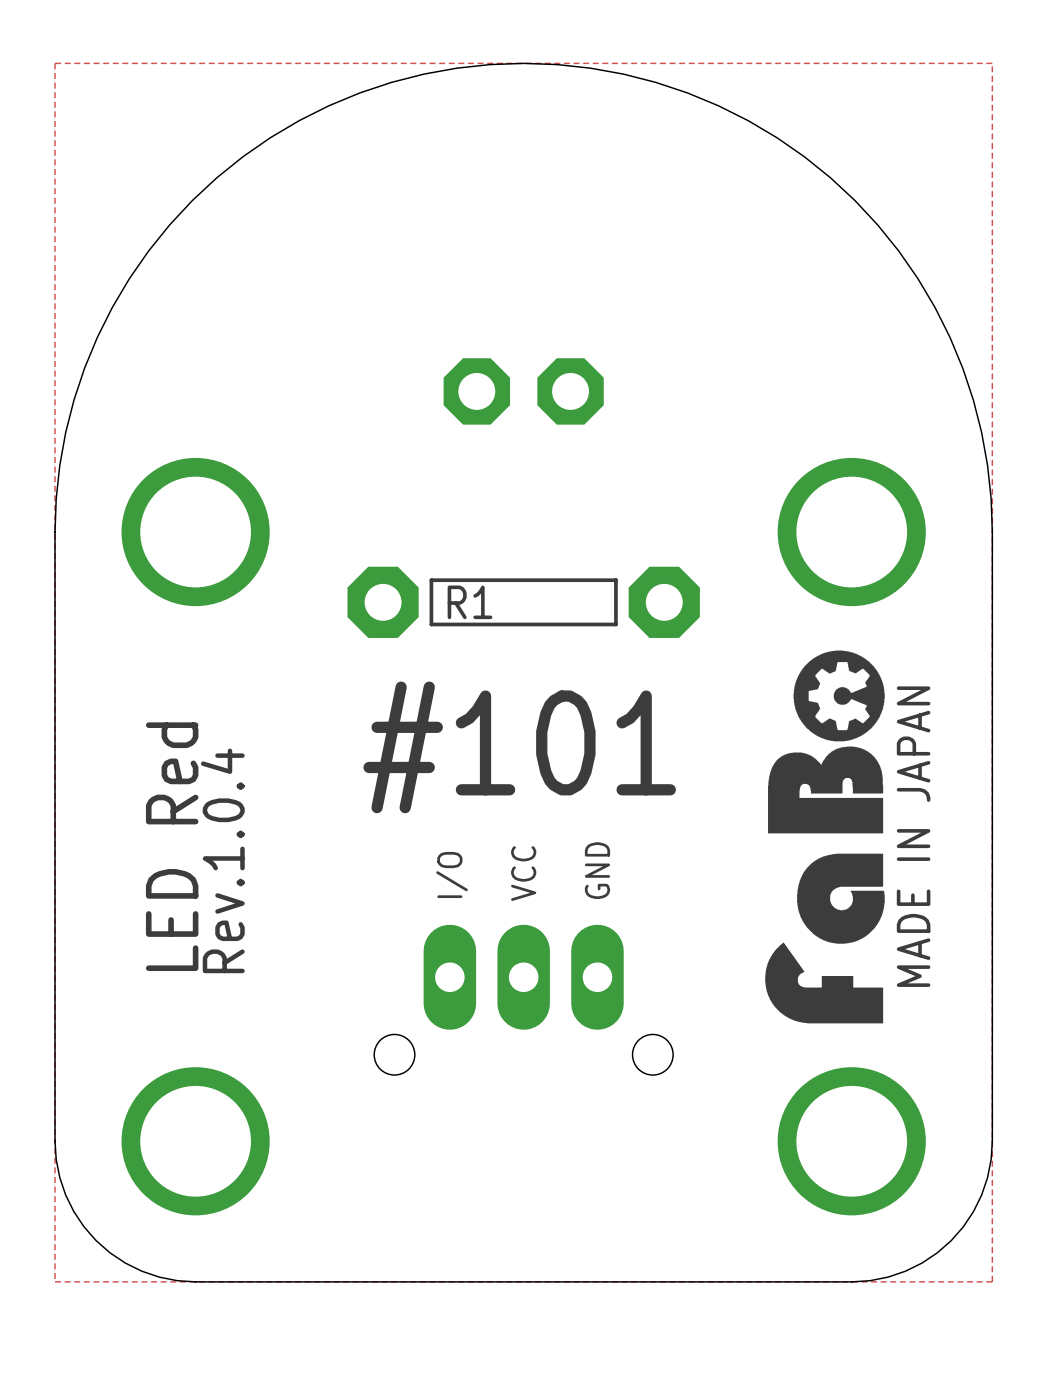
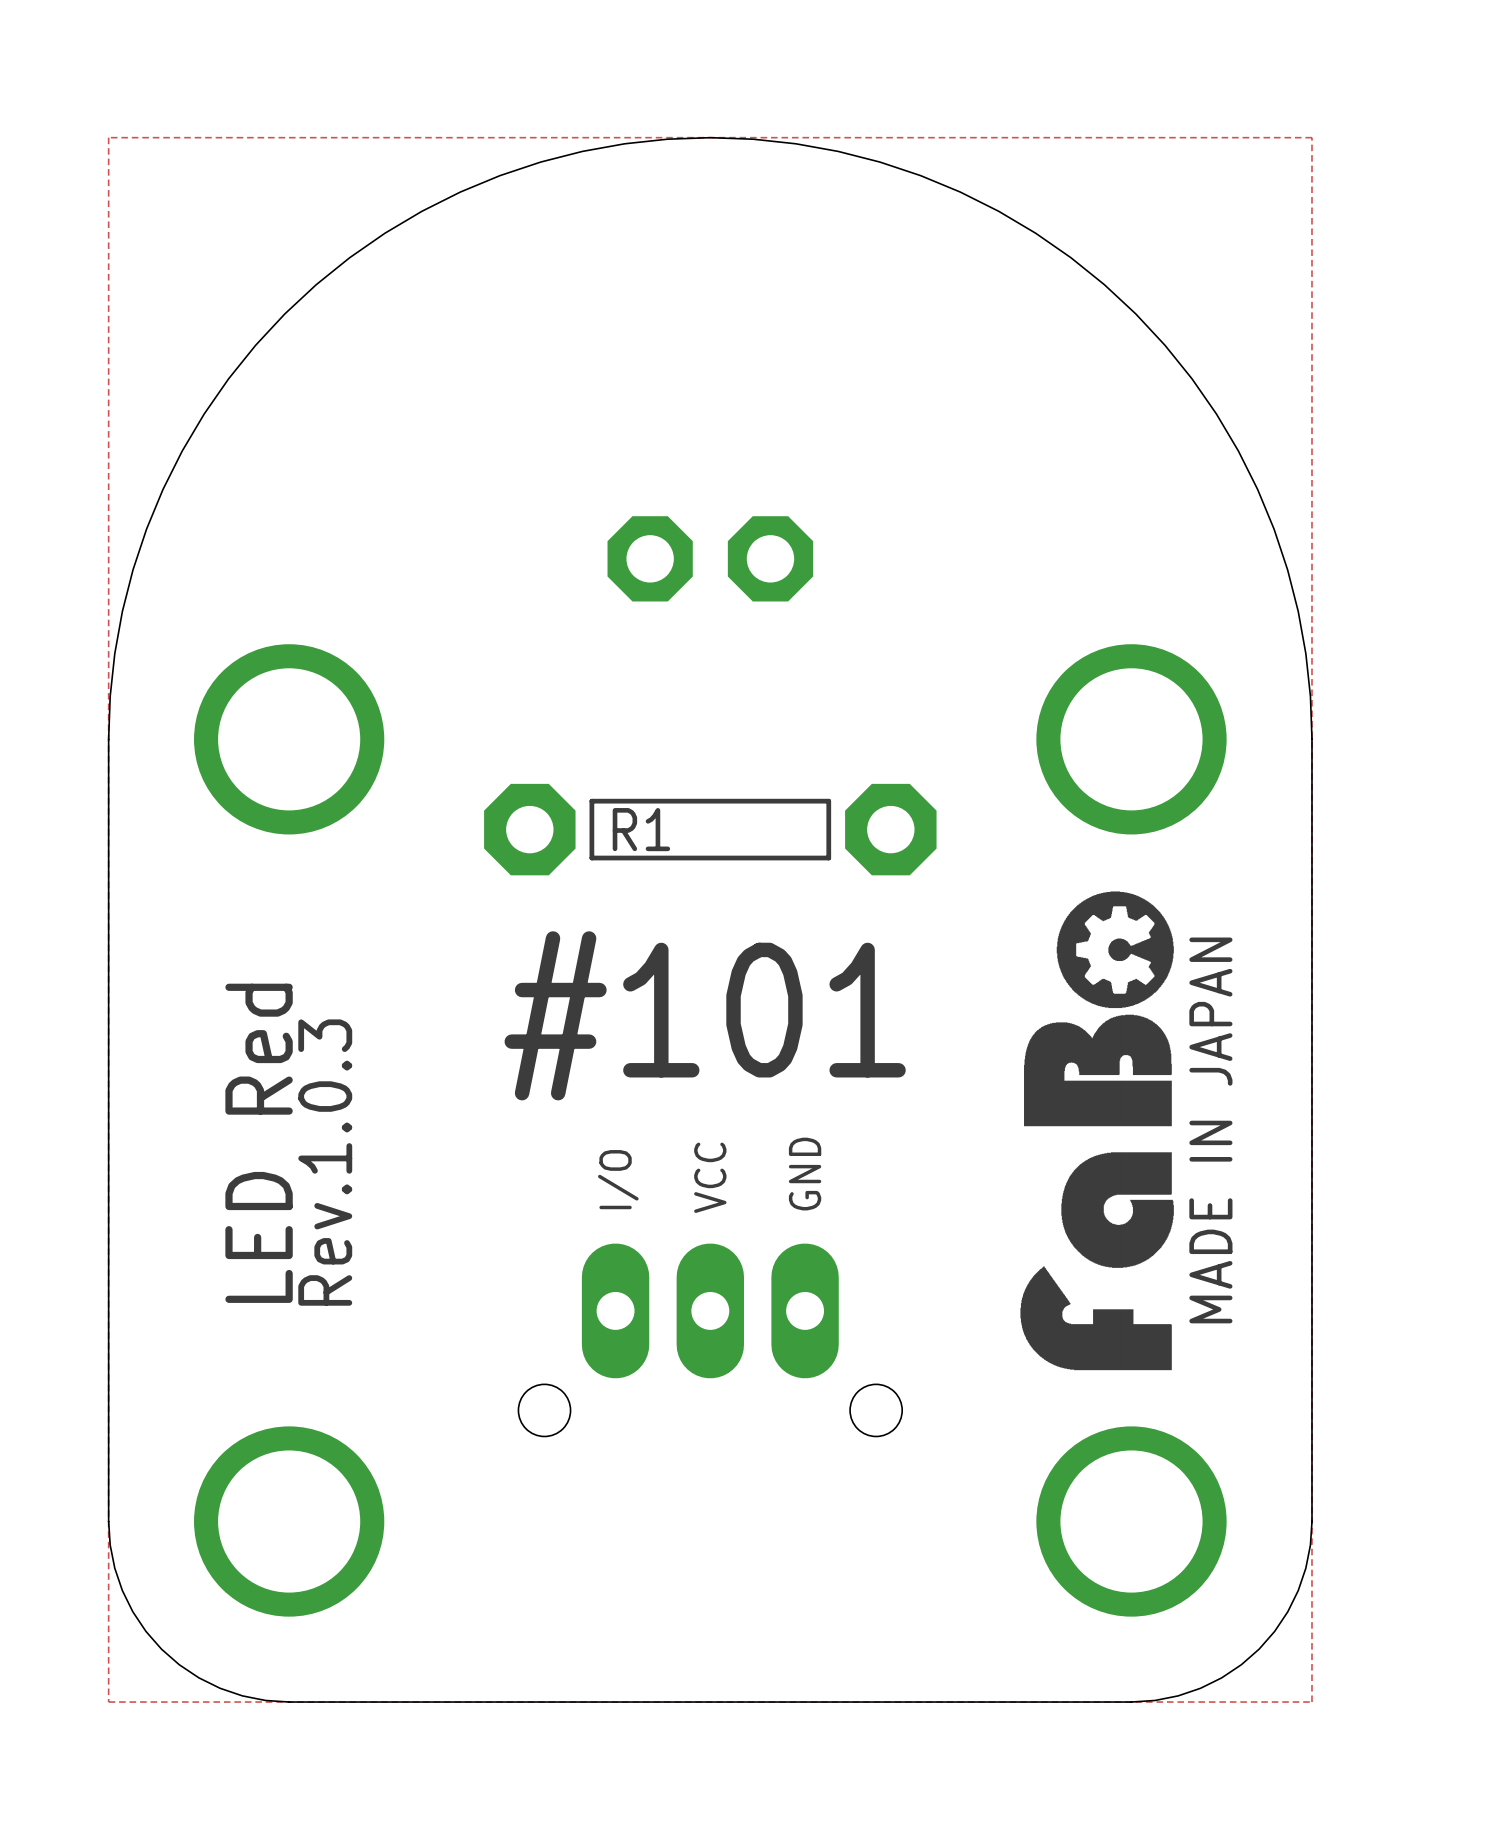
text: Rev.1.0.4 (222, 860) -> Rev.1.0.3 (325, 1162)

